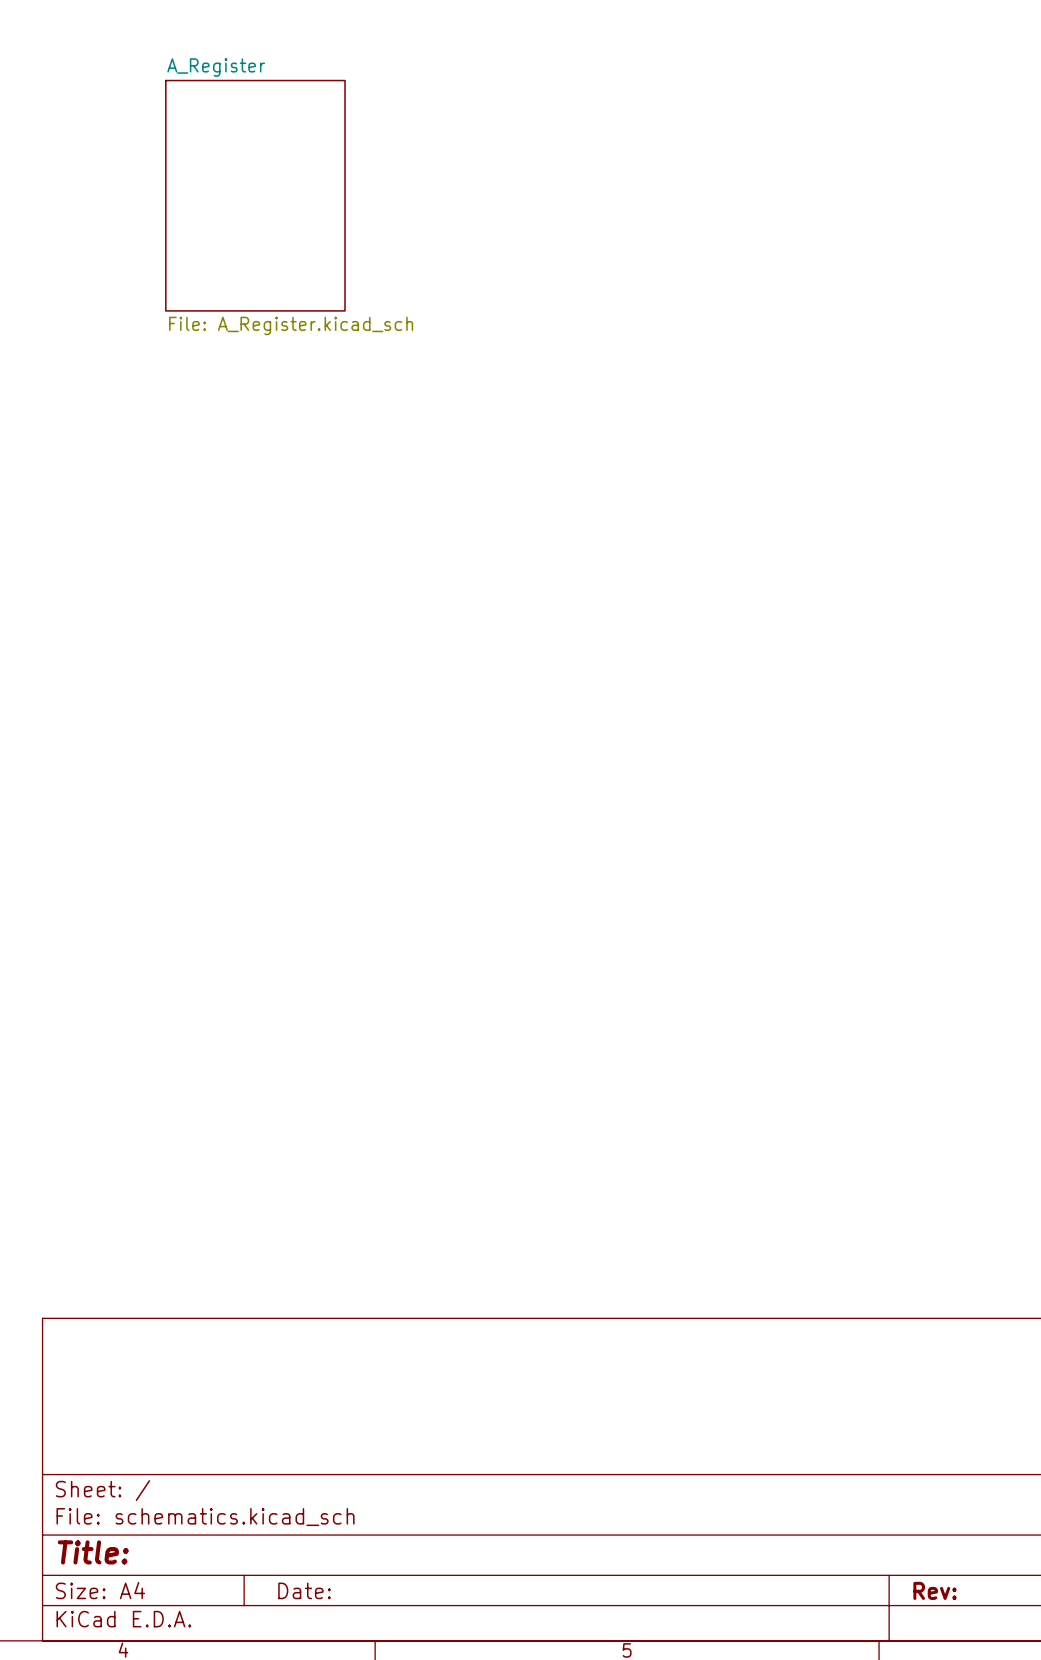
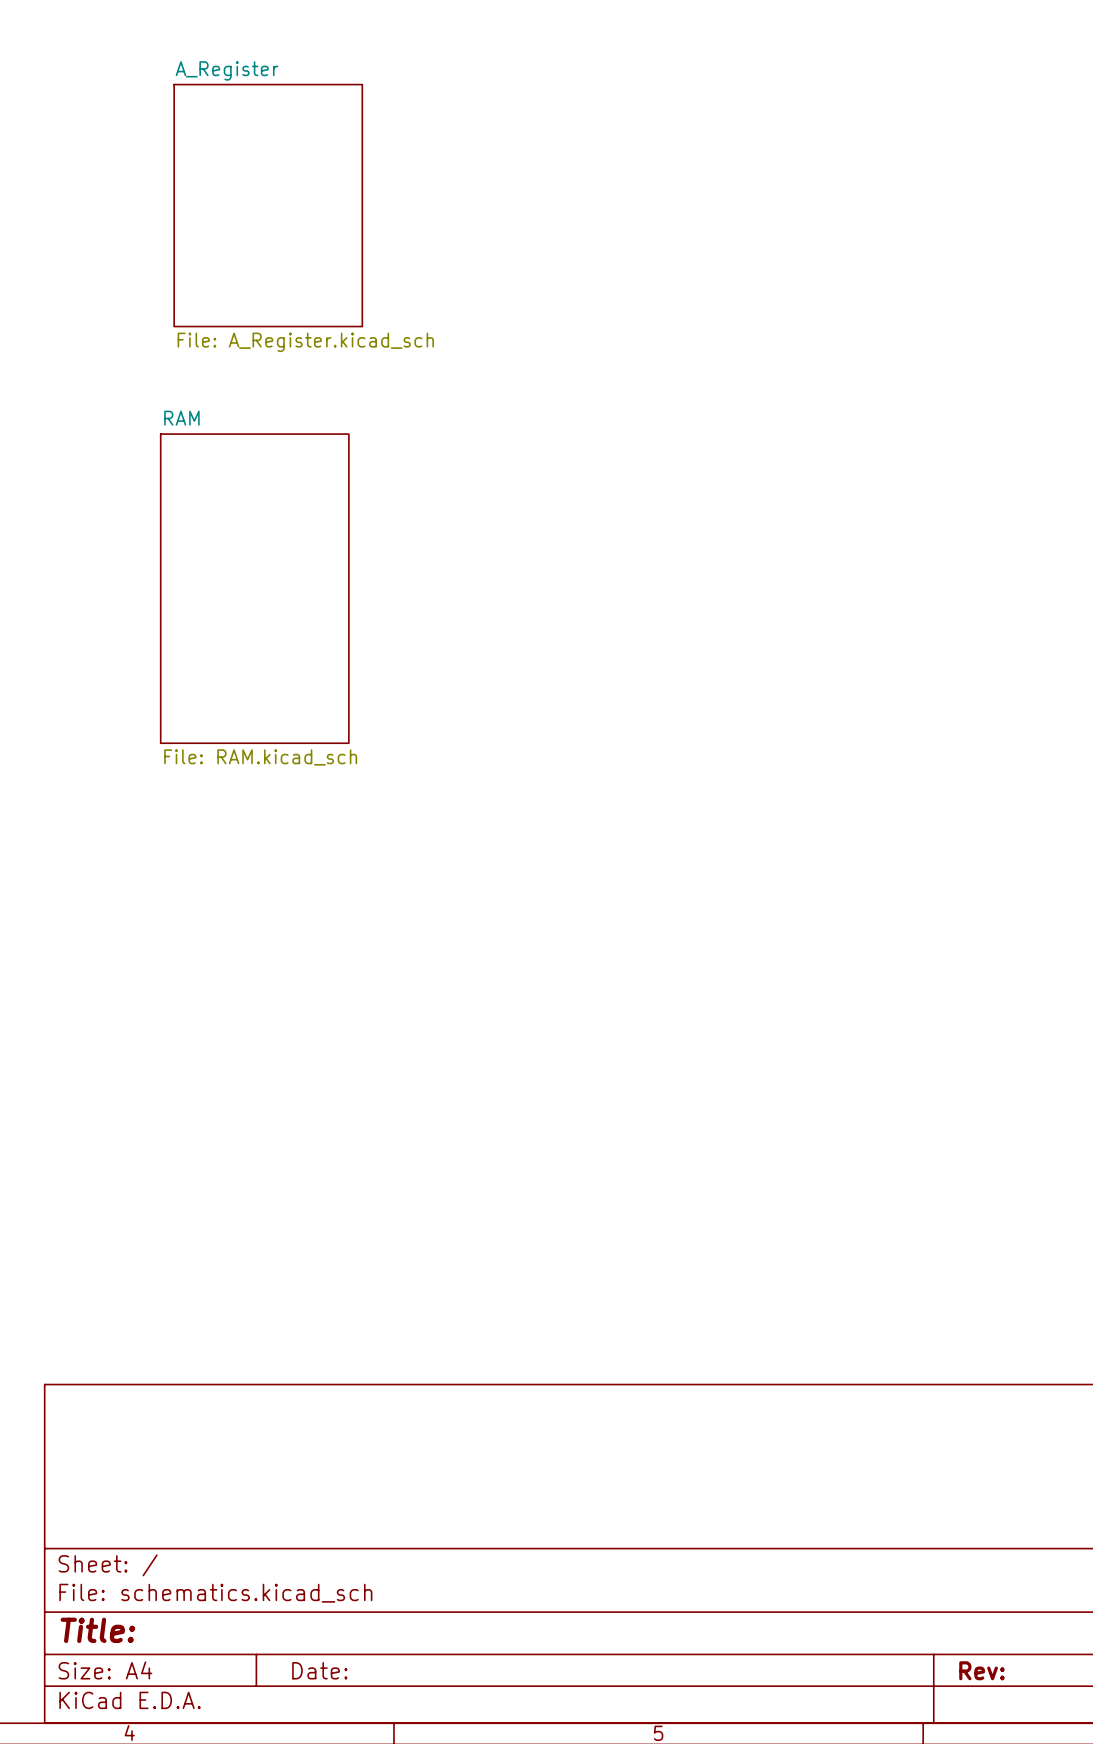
sheet RAM: none -> File: RAM.kicad_sch (254, 588)

